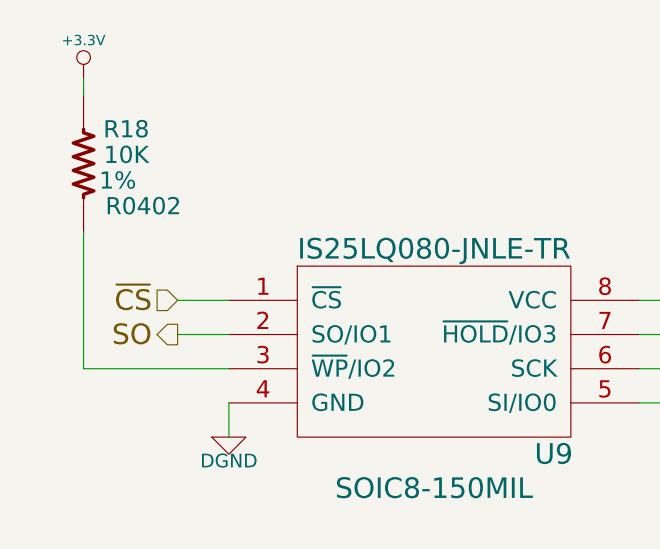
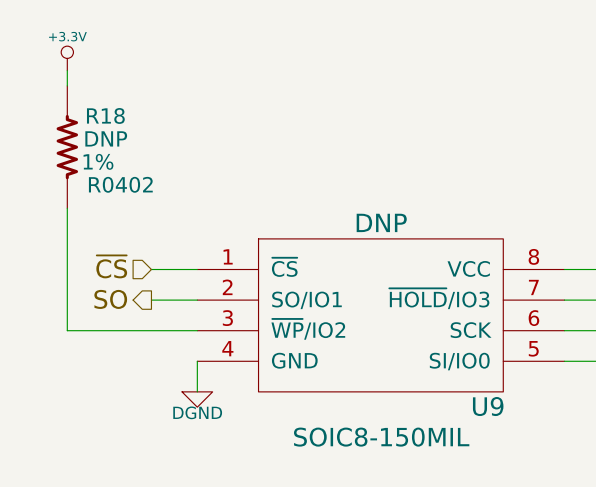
R18 value: 10K (127, 154) -> DNP (106, 138)
U9 value: IS25LQ080-JNLE-TR (435, 250) -> DNP (381, 222)

